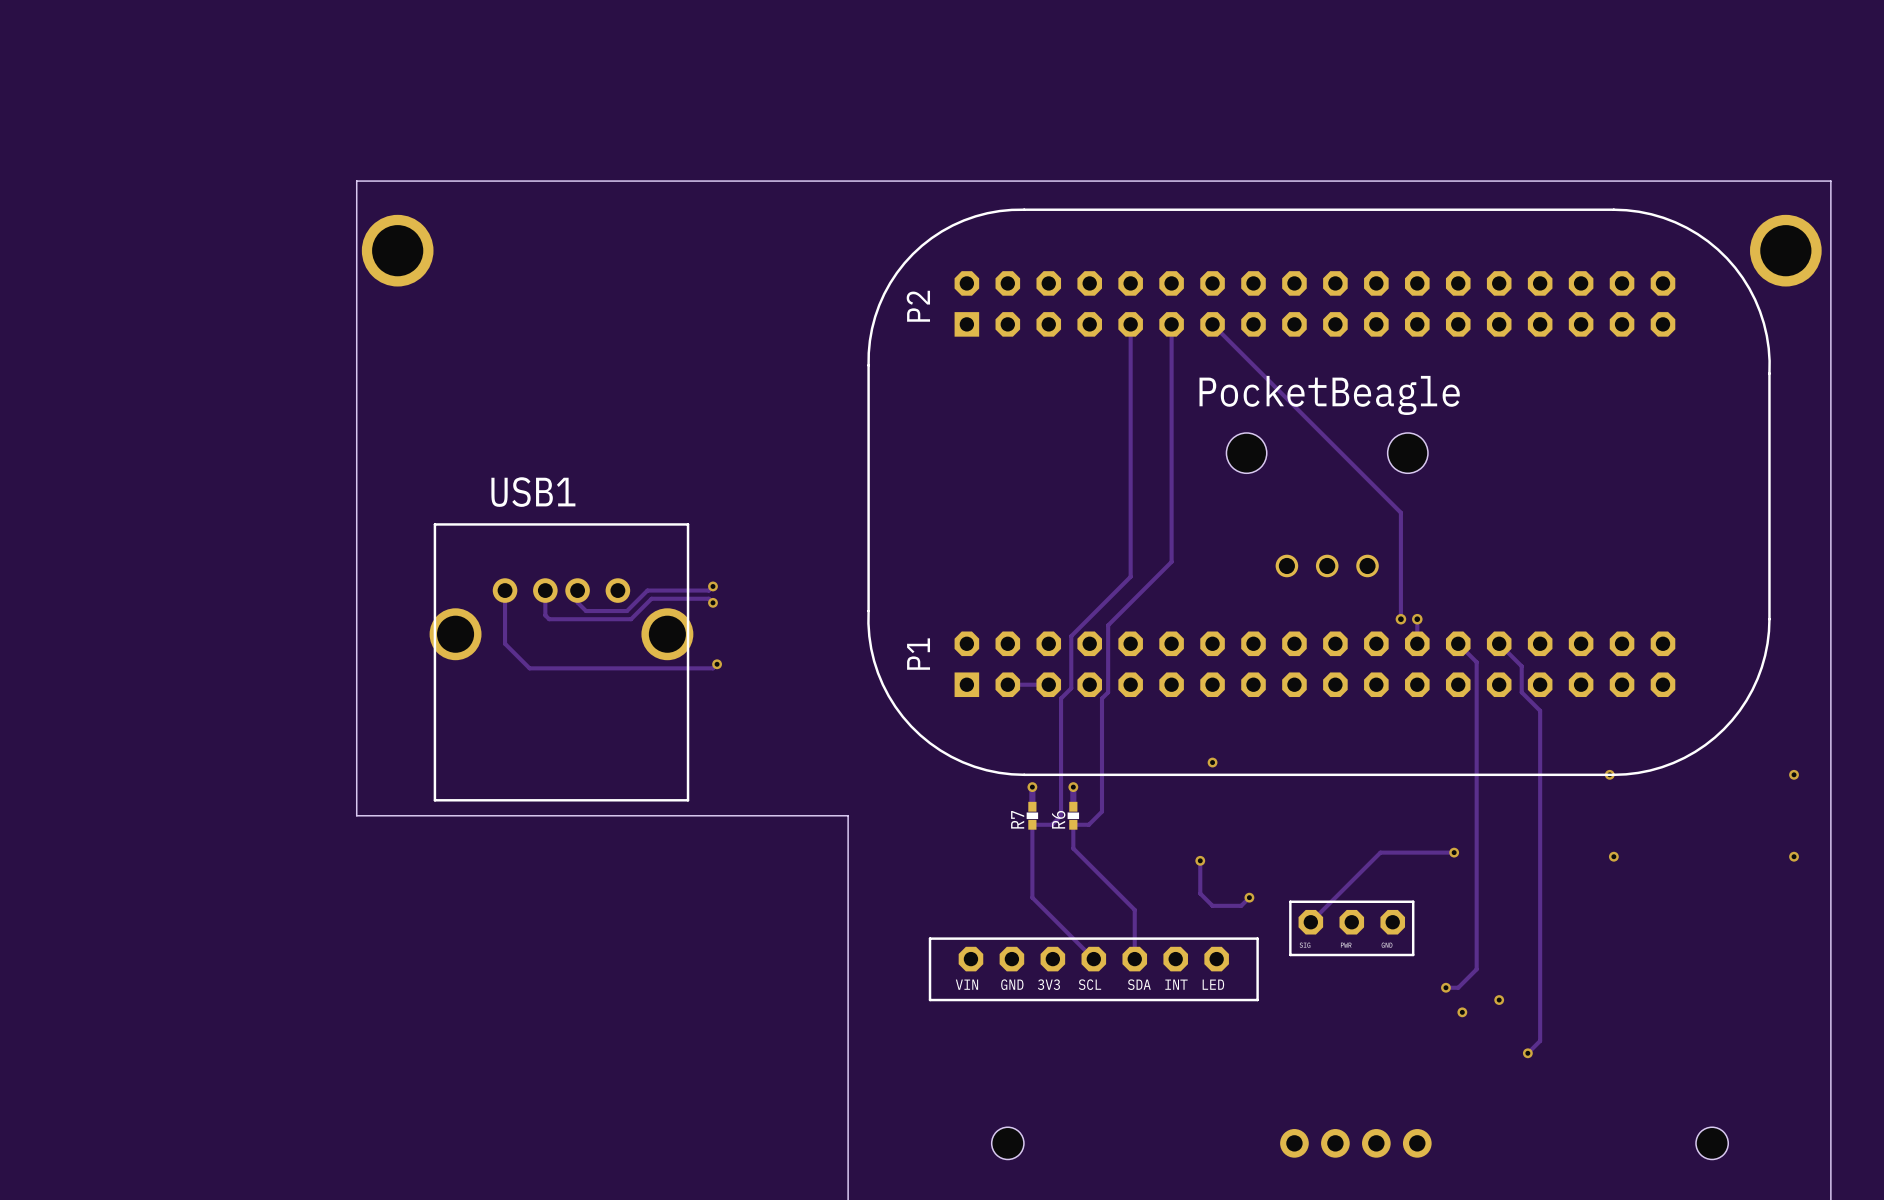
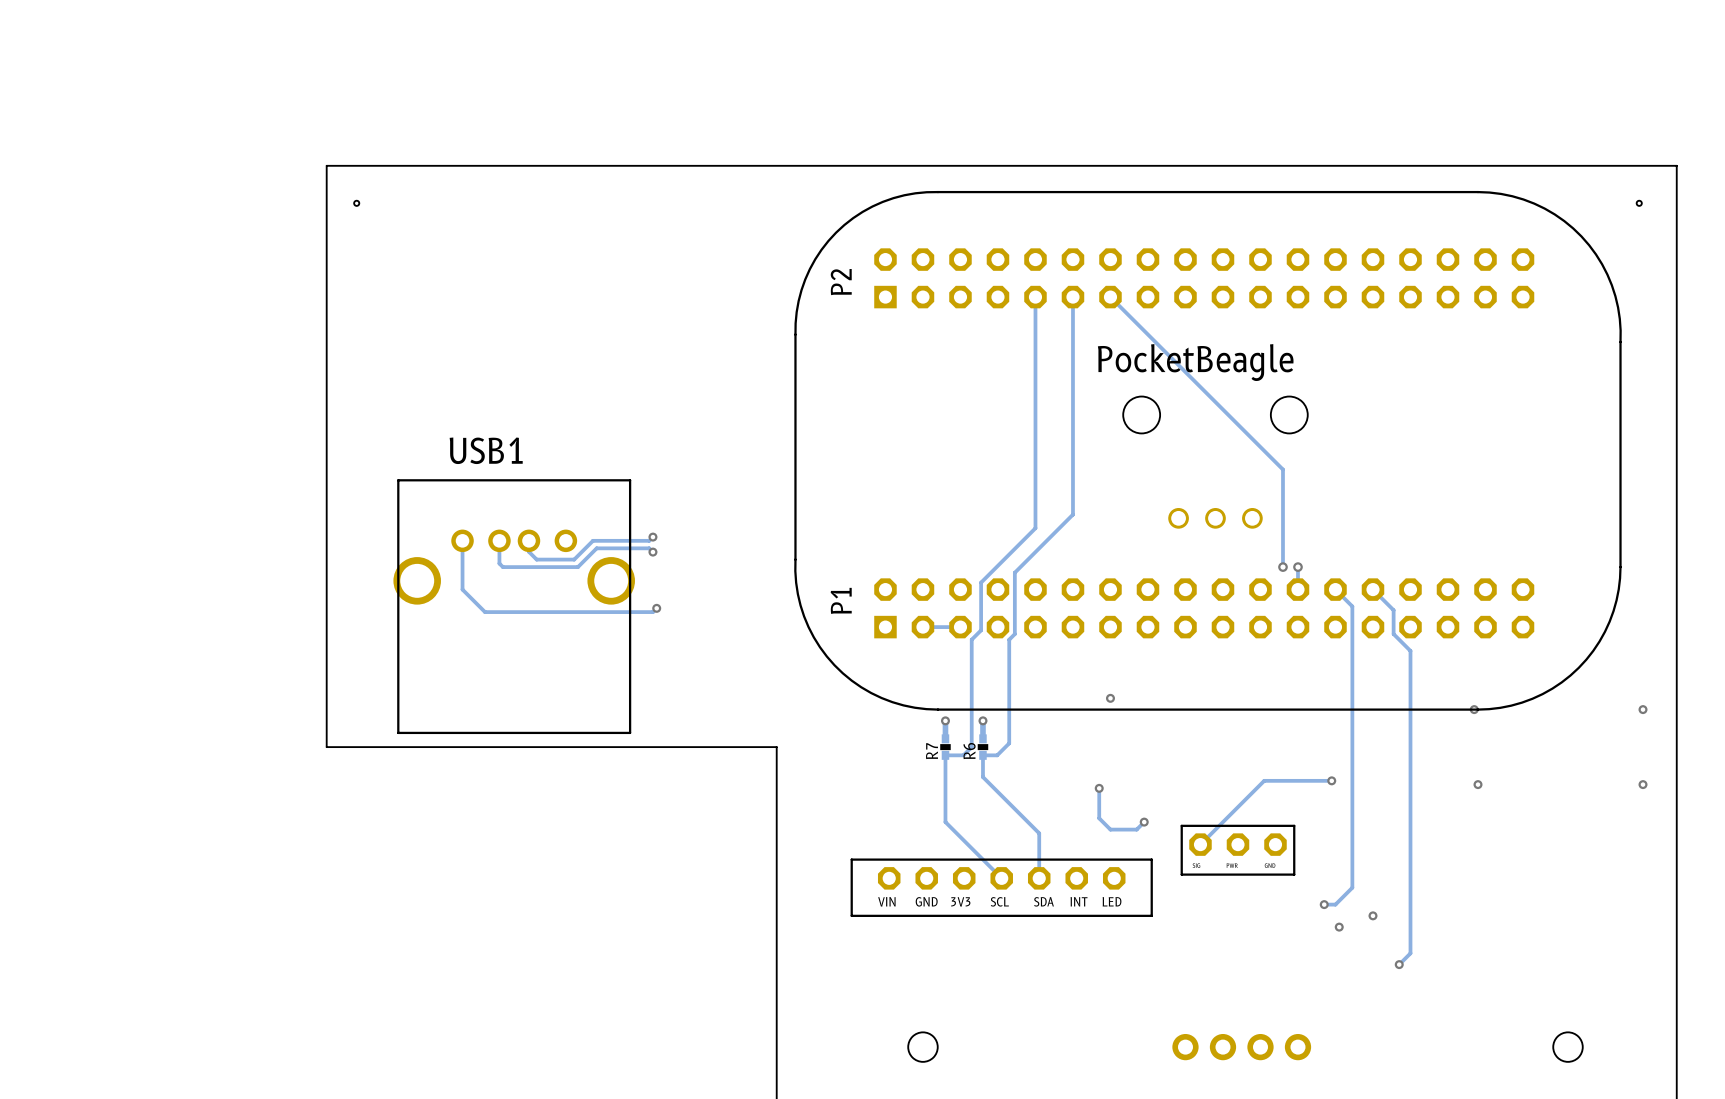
hole: none -> (356, 203)
hole: none -> (1639, 203)
part: (397, 250) -> none
part: (1785, 250) -> none

